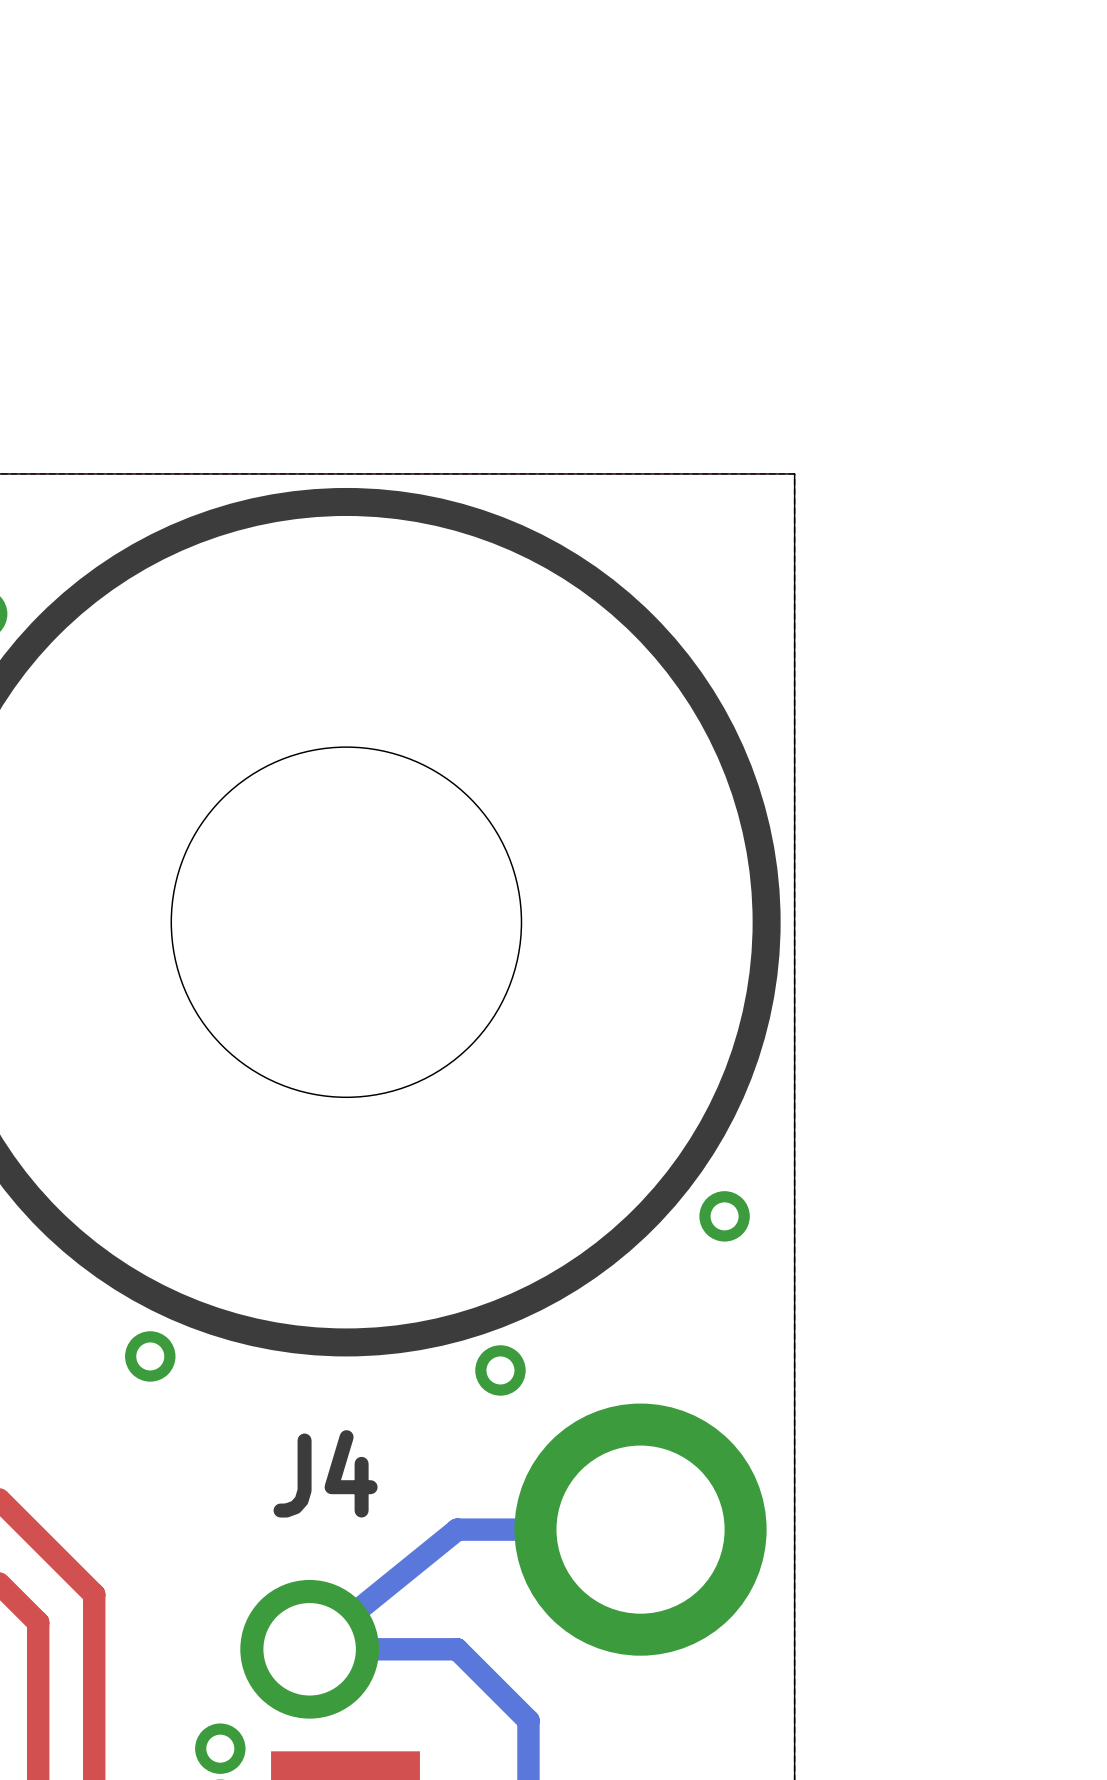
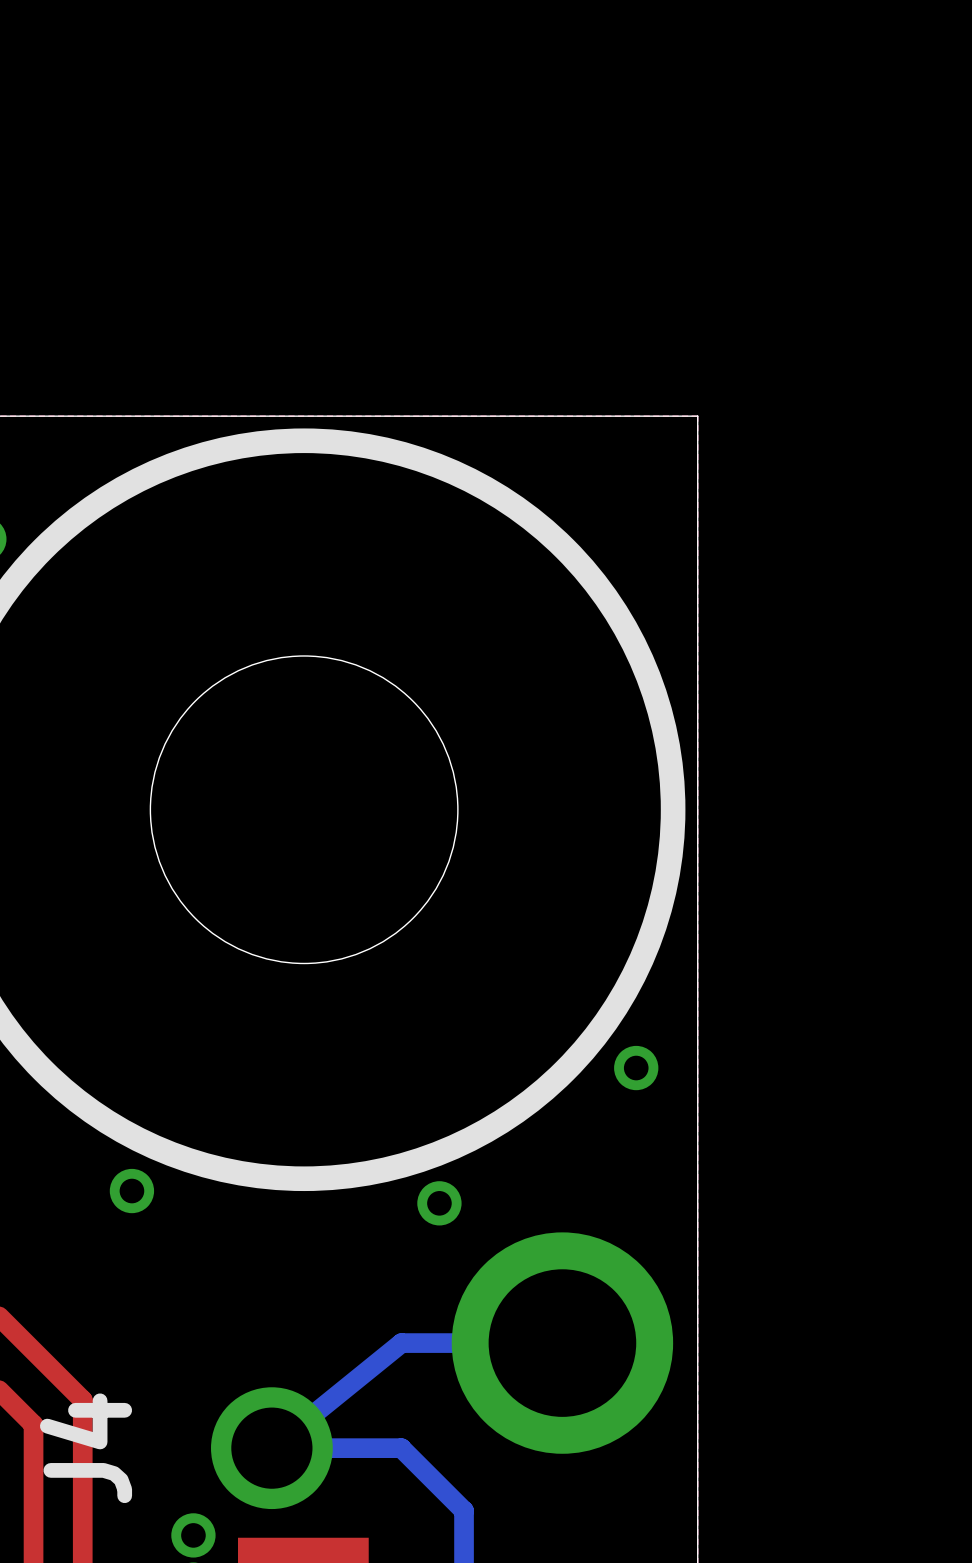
J4 name rotation: 0° (325, 1473) -> 90° counterclockwise (86, 1448)
J4 name position: J4 (325, 1473) -> J4 (86, 1448)

